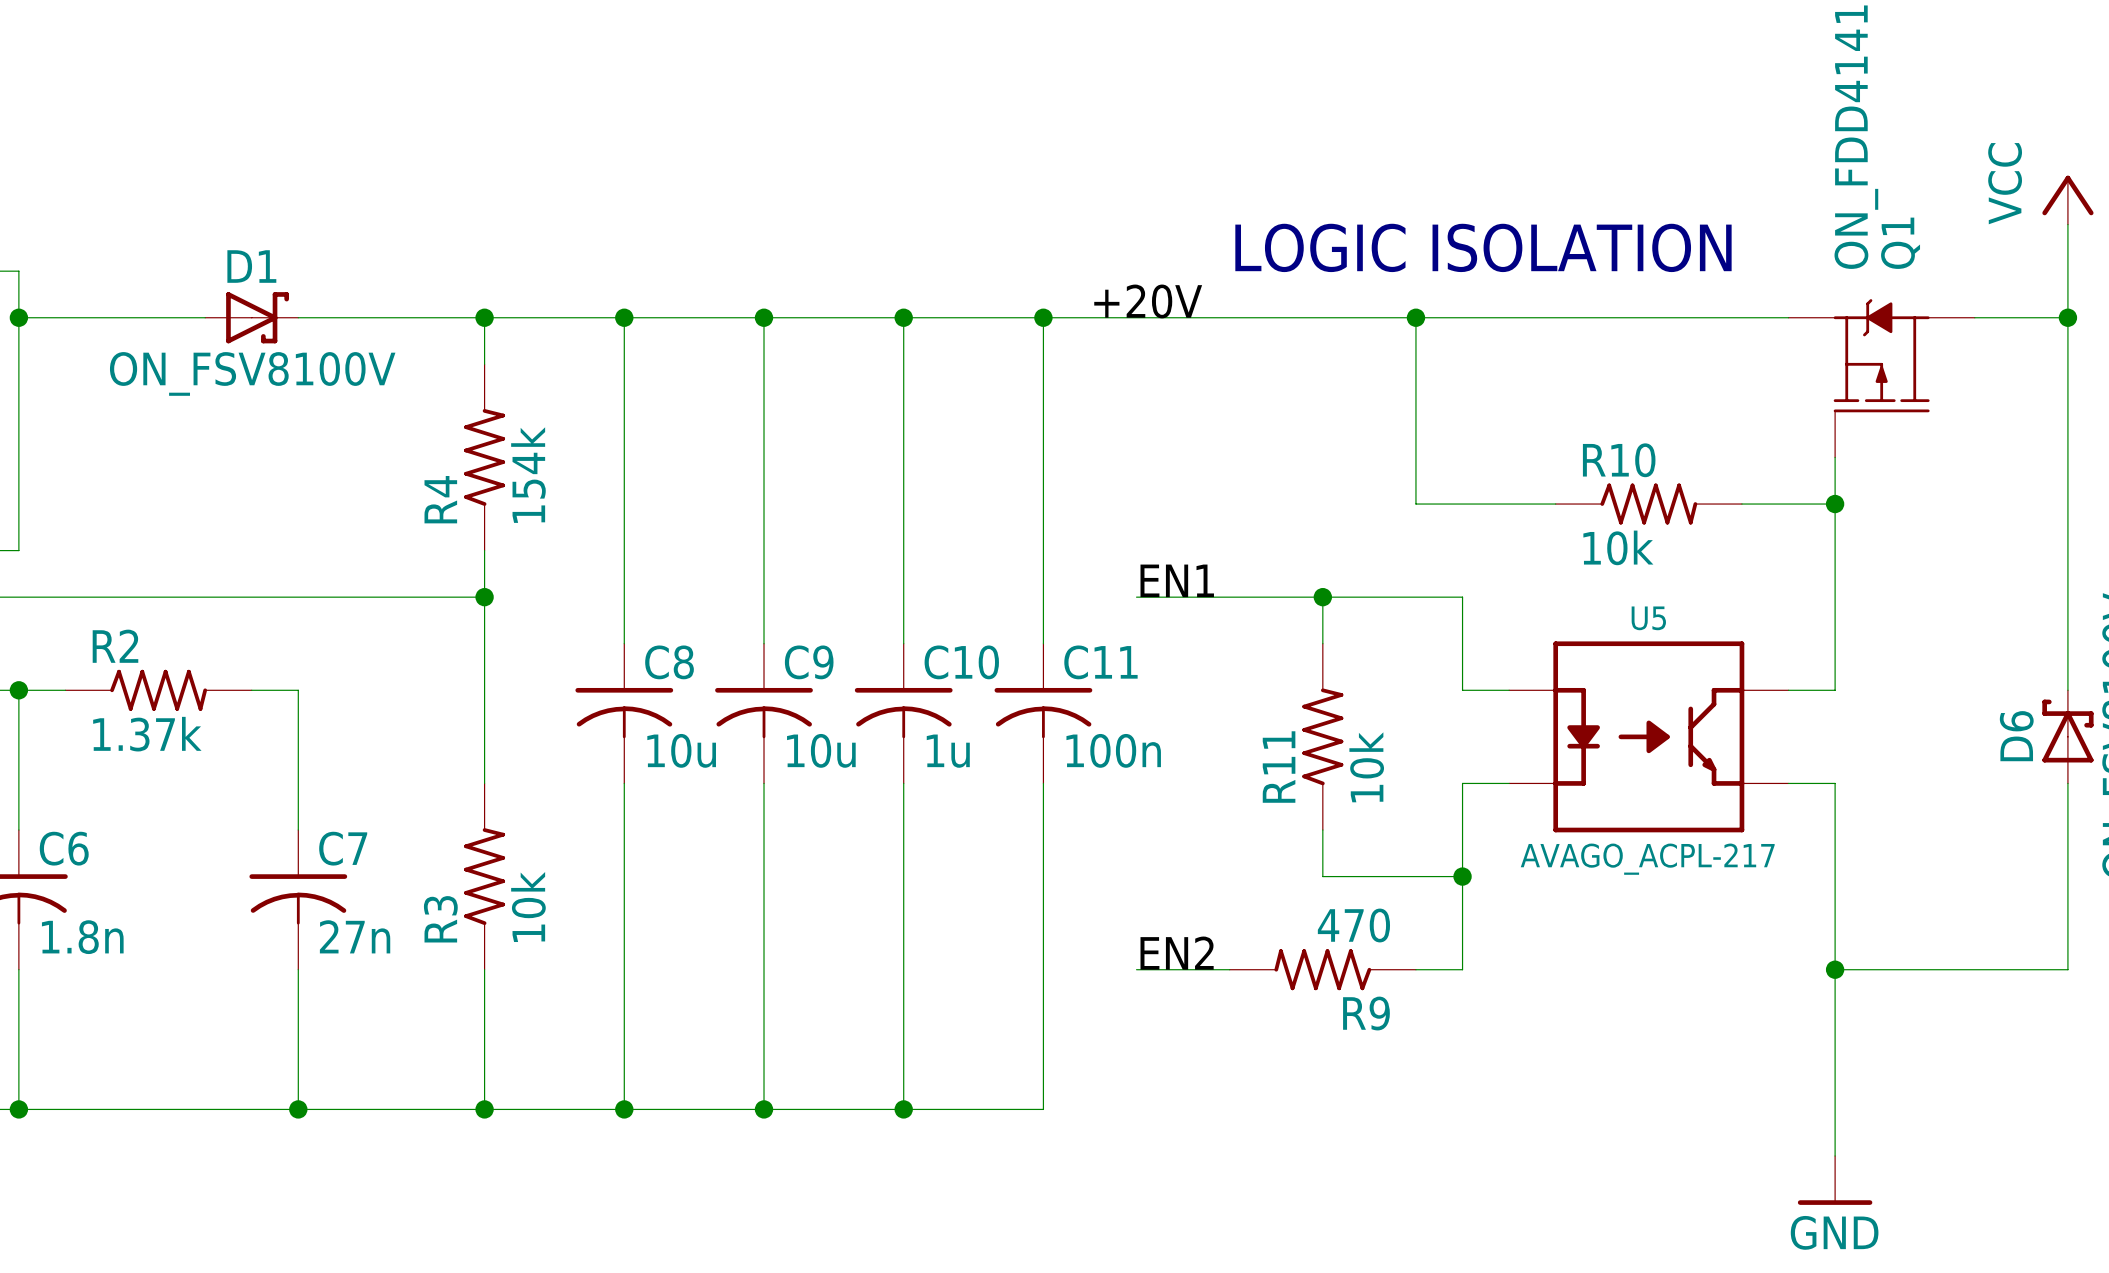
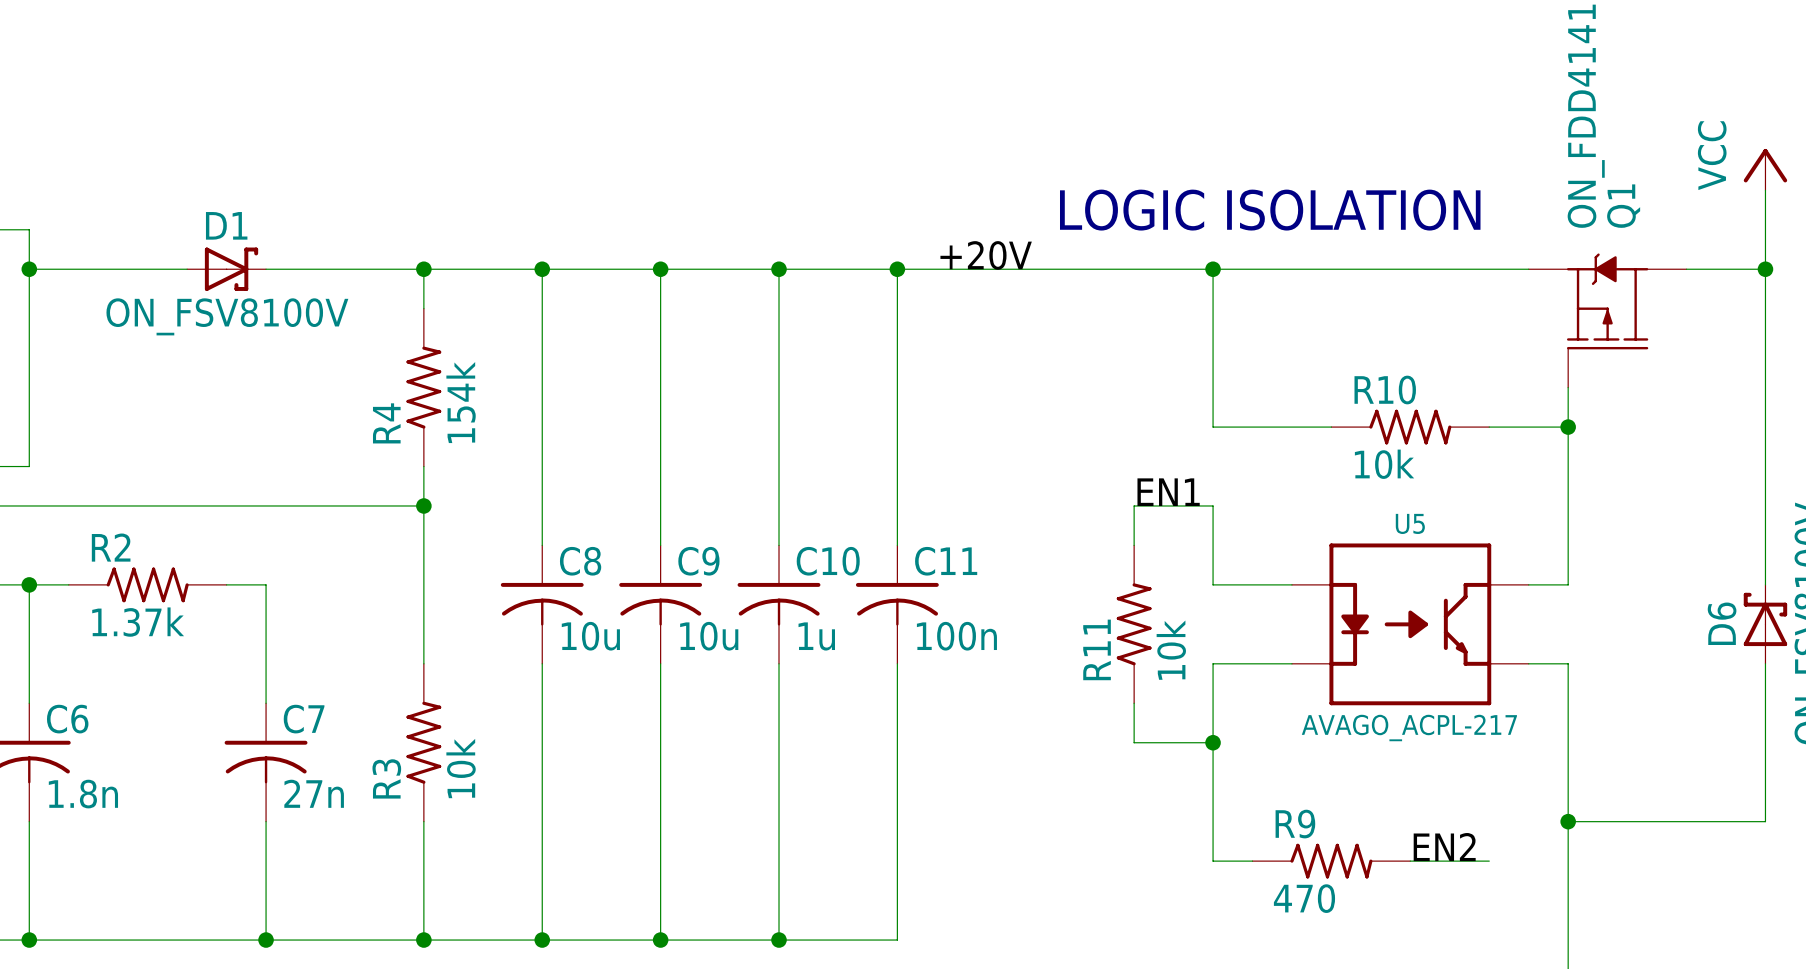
label position: EN1 (1177, 580) -> EN1 (1168, 492)
wire: (1136, 597) (1322, 597) -> none
junction: (1322, 597) -> none
wire: (1415, 597) (1462, 597) (1462, 690) -> (1213, 505) (1213, 584) (1252, 584)
wire: (1462, 783) (1462, 969) (1415, 969) -> (1252, 663) (1213, 663) (1213, 861) (1252, 861)
wire: (1415, 876) (1462, 876) -> none
junction position: (1462, 876) -> (1213, 742)
label: EN2 (1177, 953) -> none
wire: (1136, 969) (1229, 969) -> none
R9 rotation: 0° (1322, 969) -> 180° (1331, 861)
R9 position: (1322, 969) -> (1331, 861)
label: none -> EN2 (1444, 847)
wire: none -> (1410, 861) (1489, 861)

